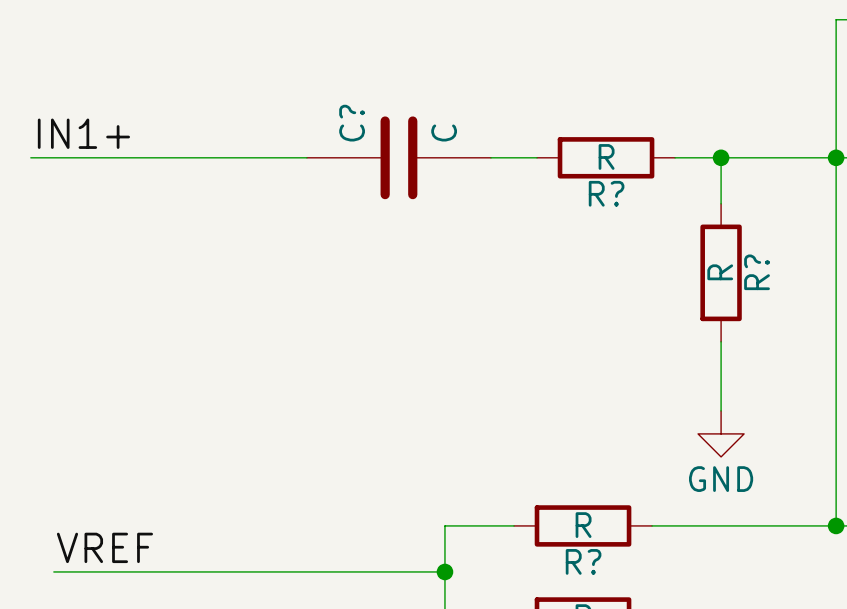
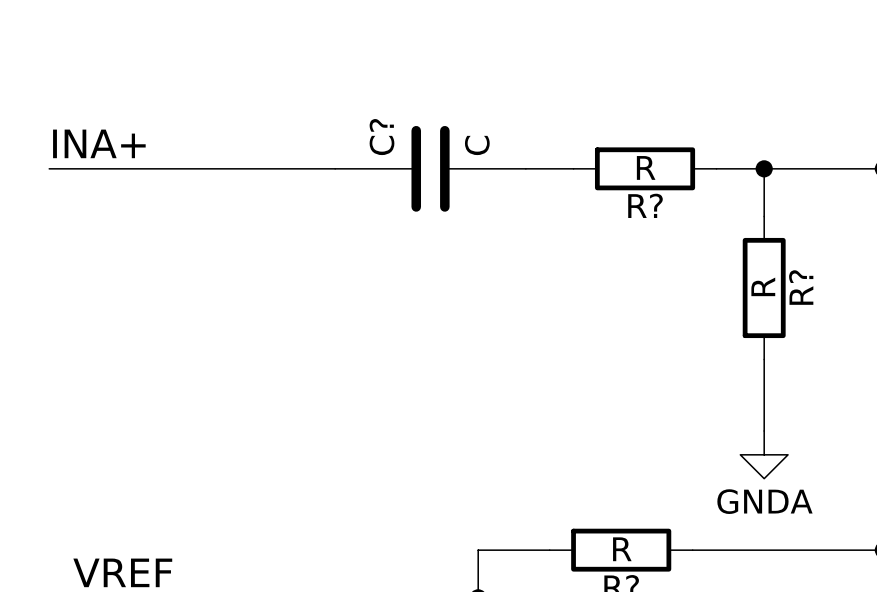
label: IN1+ (83, 133) -> INA+ (99, 143)
power symbol: GND (721, 433) -> GNDA (764, 454)

